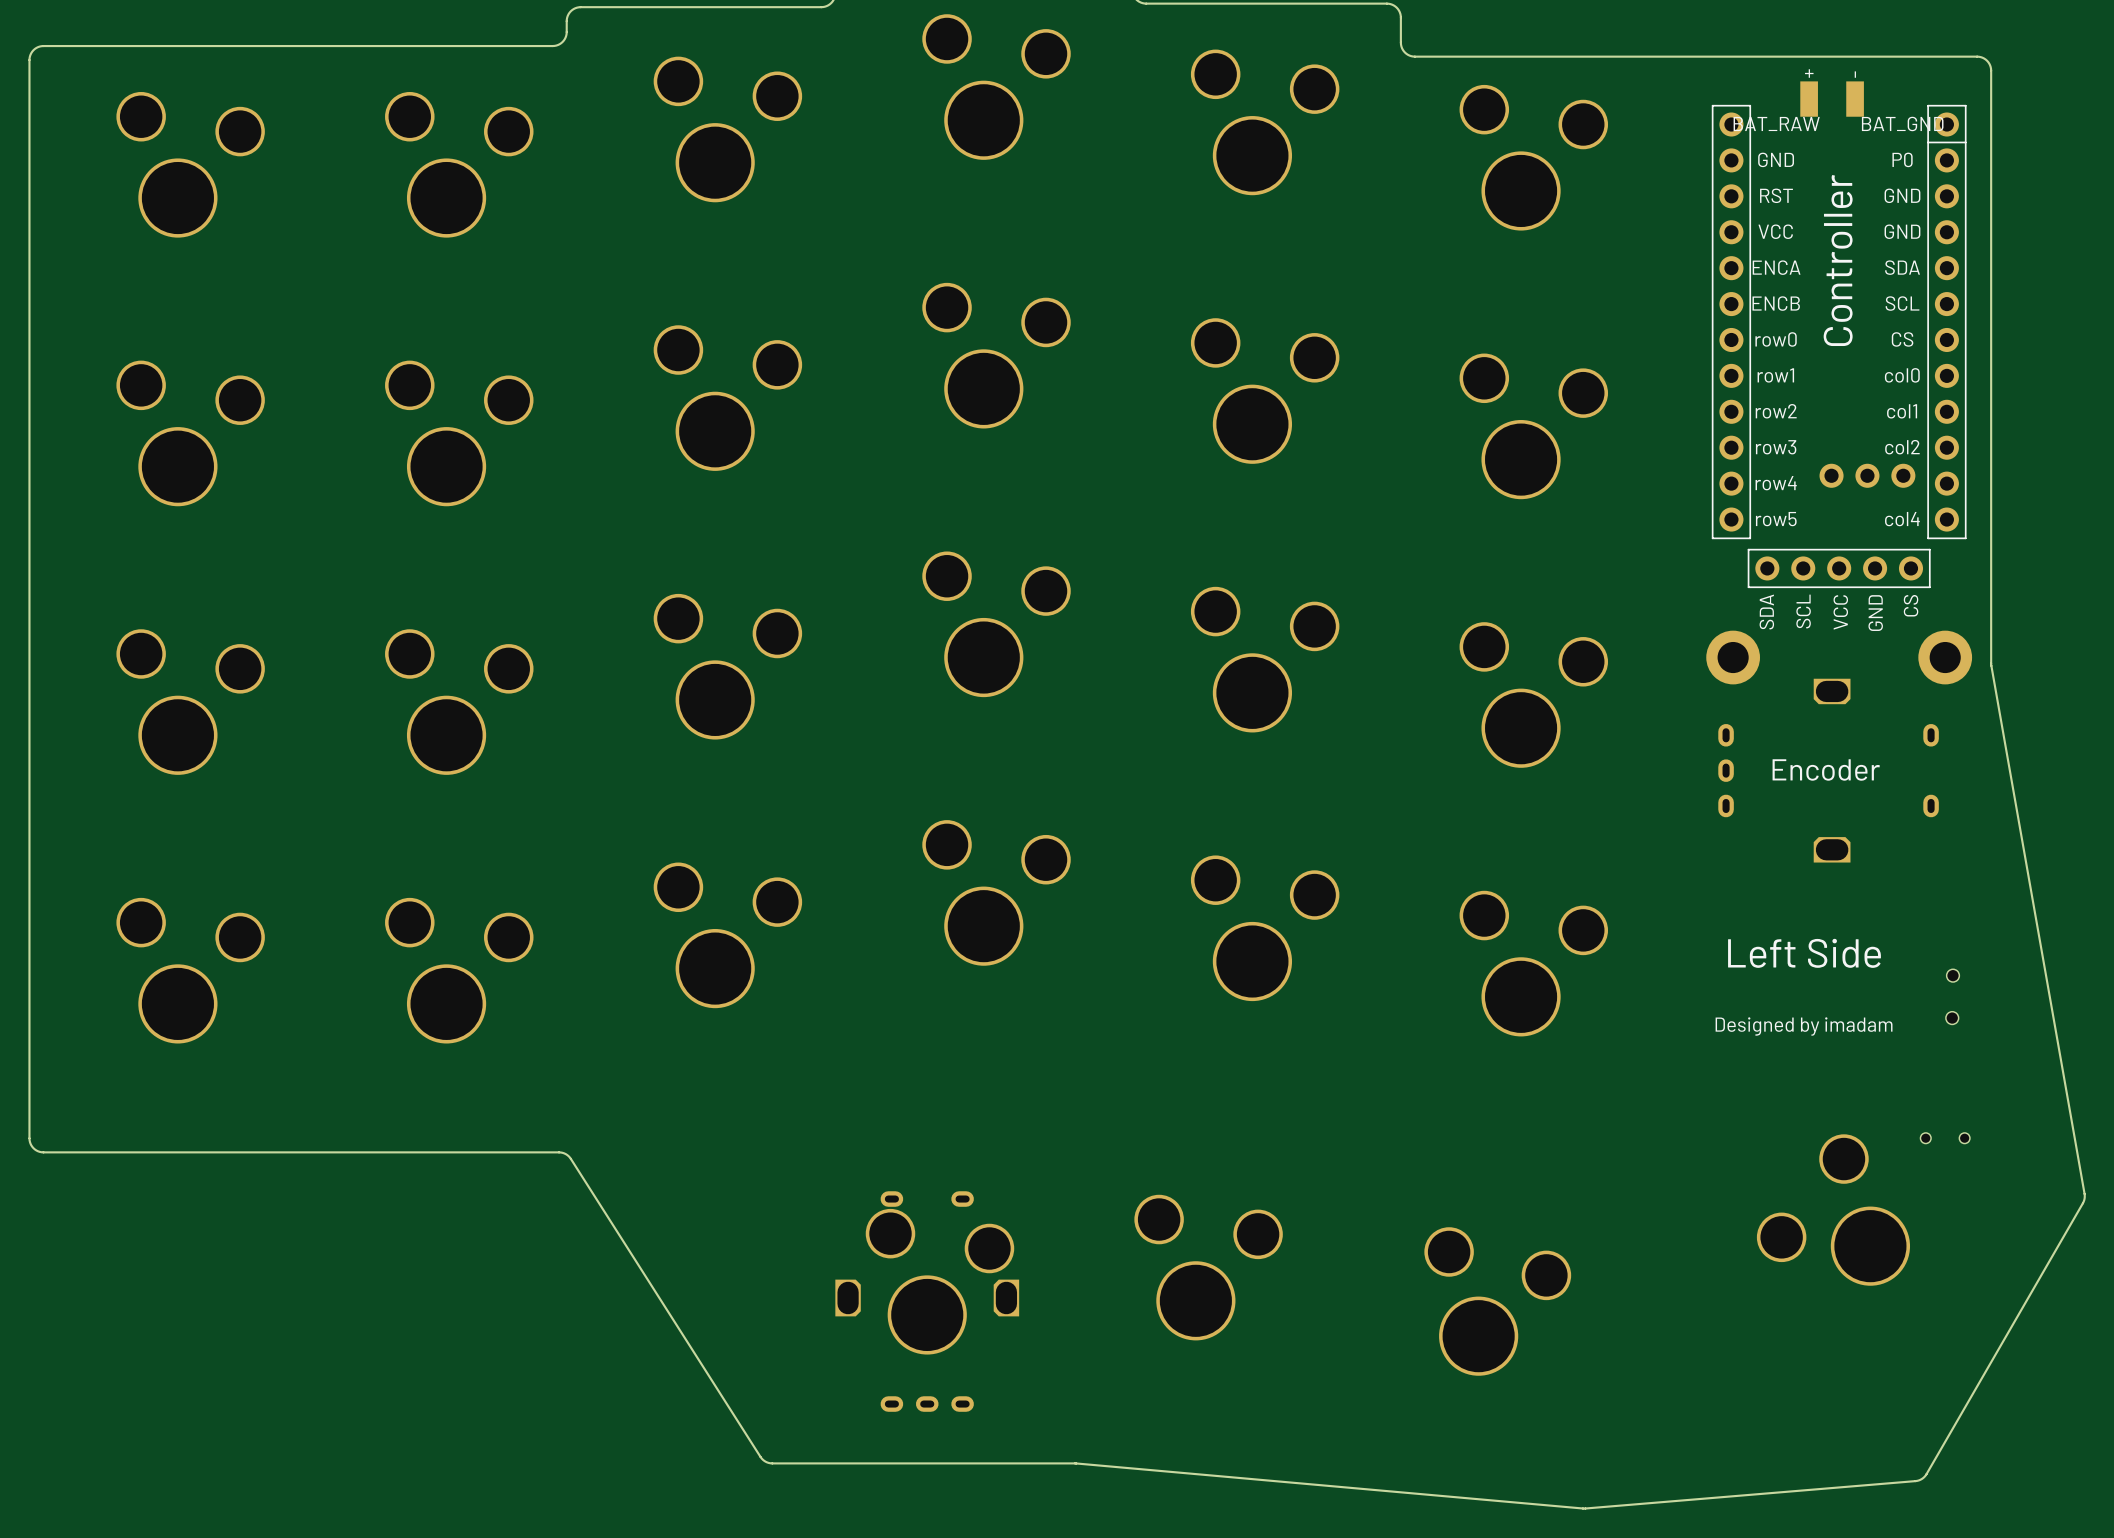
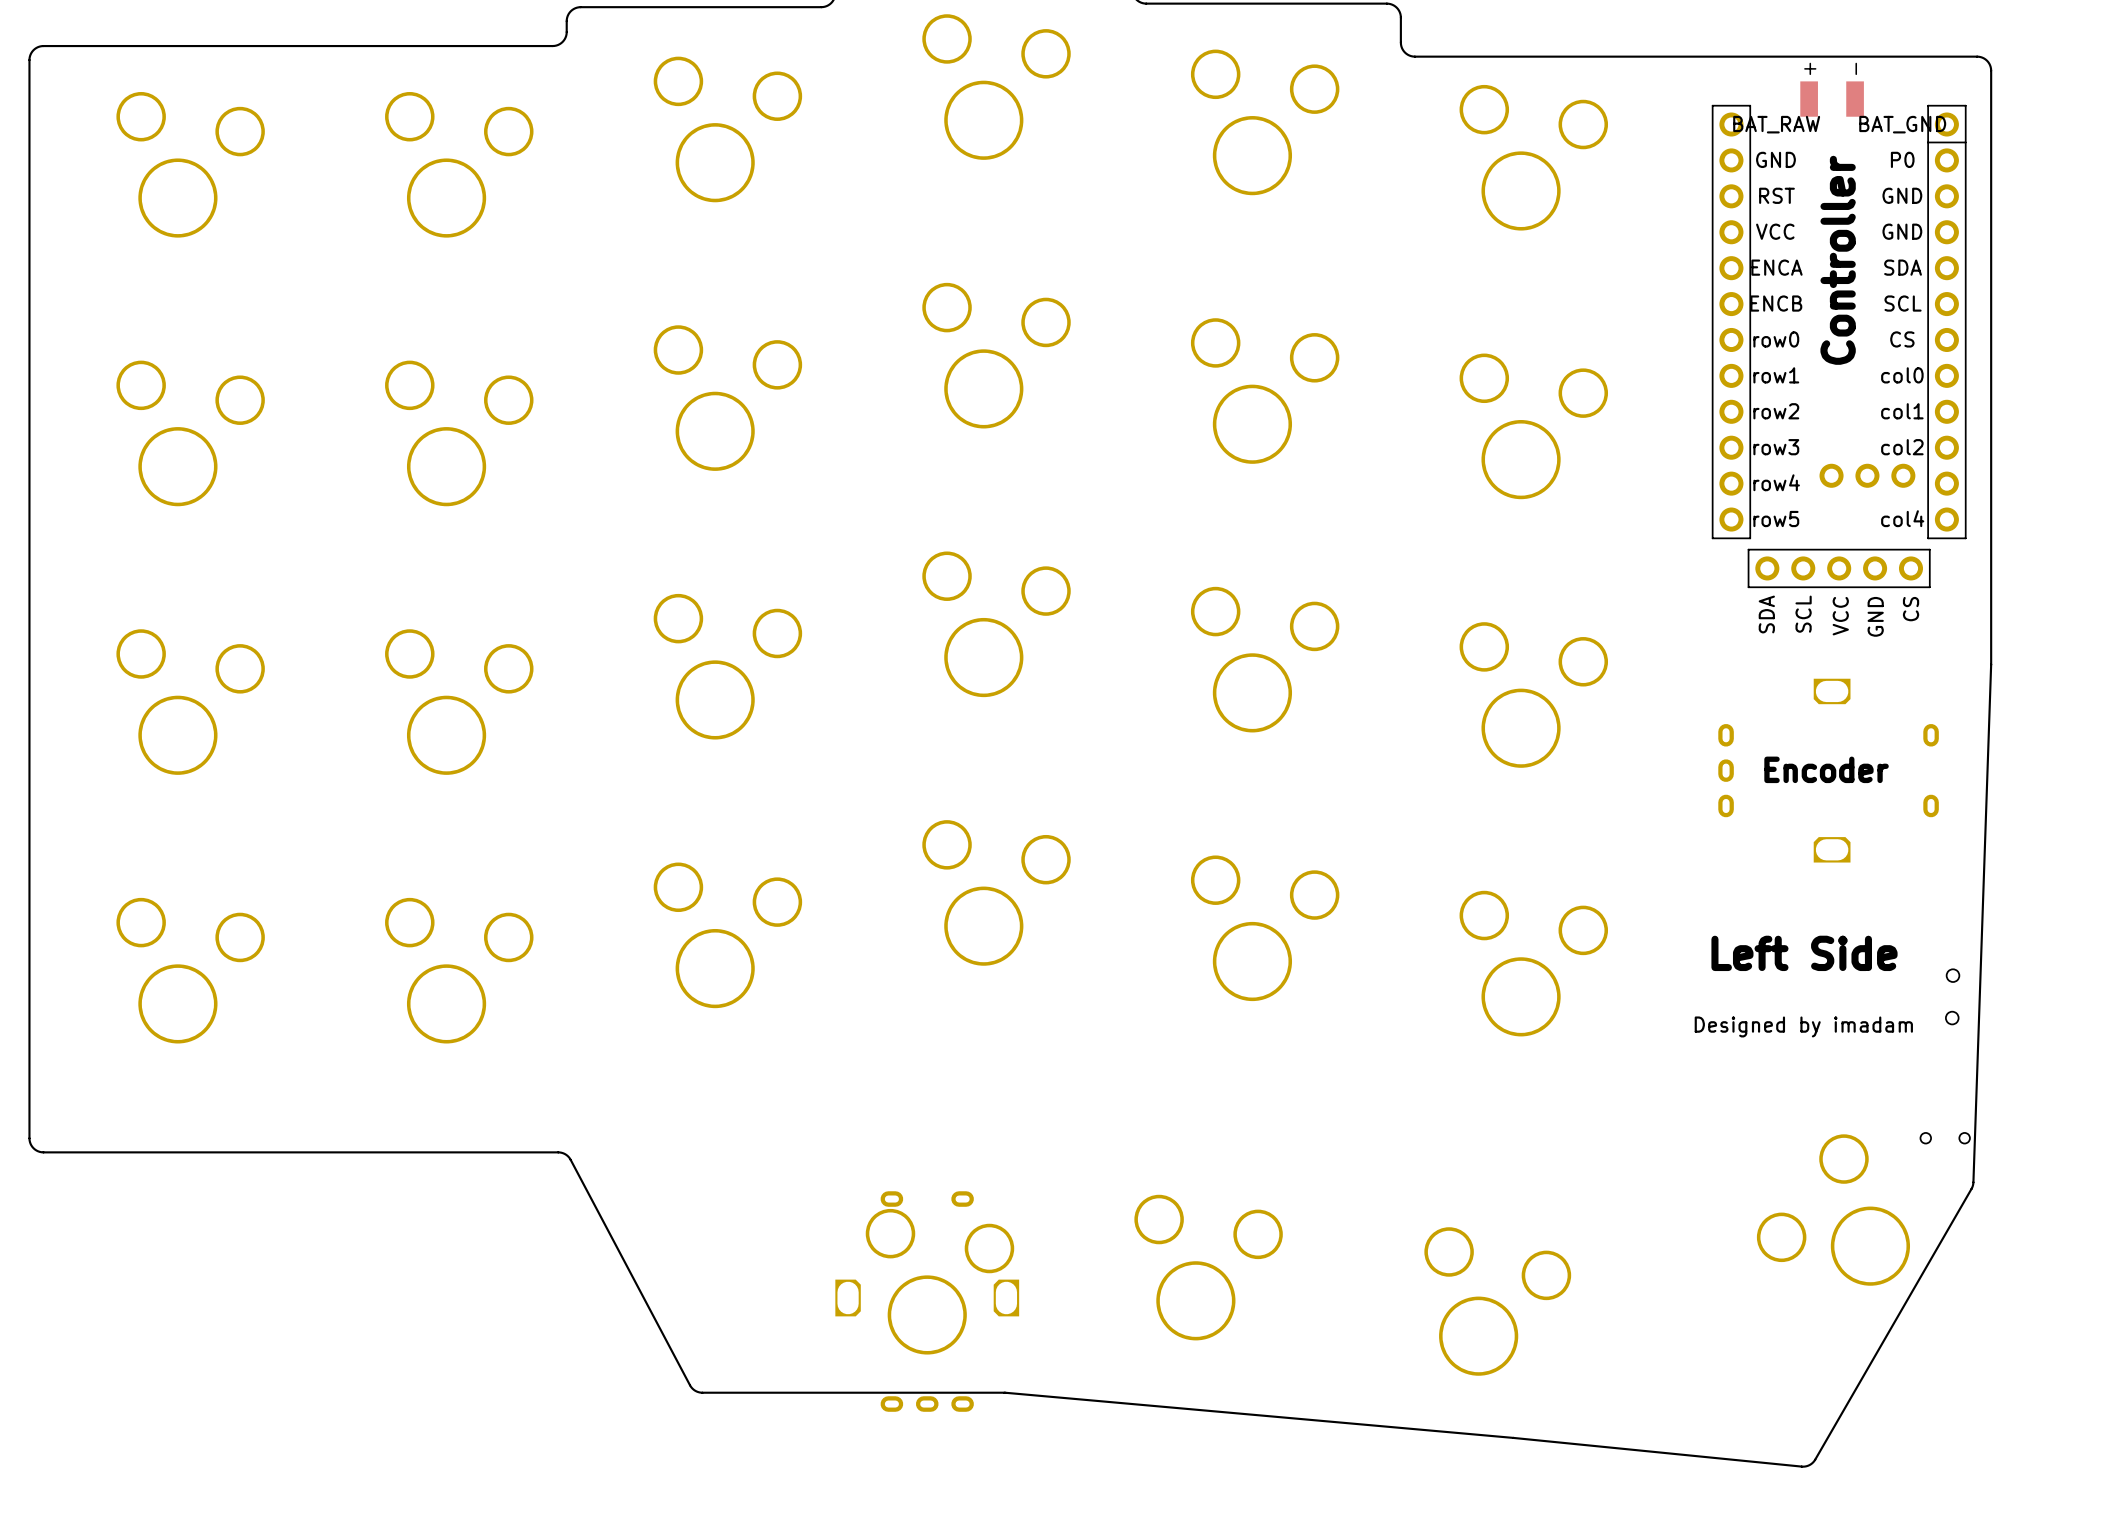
part: (1733, 657) -> none
part: (1945, 657) -> none
board edge: (1991, 663) (2084, 1197) (1926, 1474) (1918, 1480) (1584, 1508) (1075, 1463) (768, 1462) (760, 1456) (570, 1158) (565, 1154) (558, 1152) -> (1991, 663) (1972, 1185) (1815, 1459) (1808, 1465) (1005, 1392) (699, 1392) (690, 1385) (570, 1159) (565, 1154) (558, 1152)

